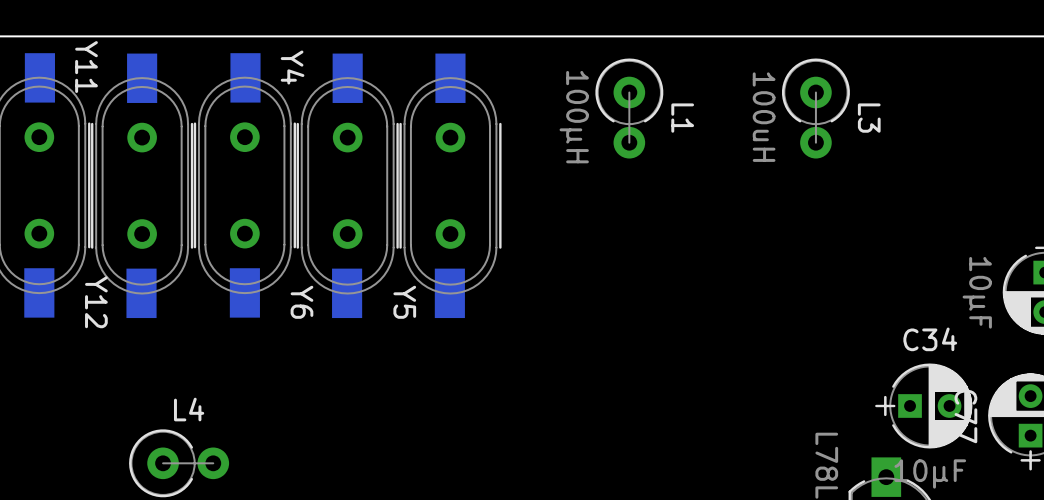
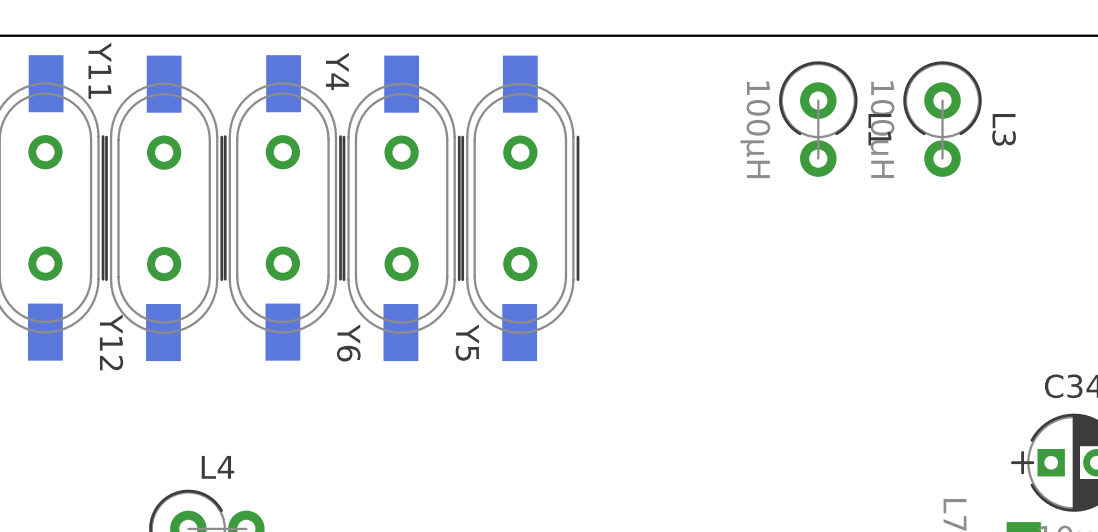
L1 position: (629, 108) -> (818, 119)

